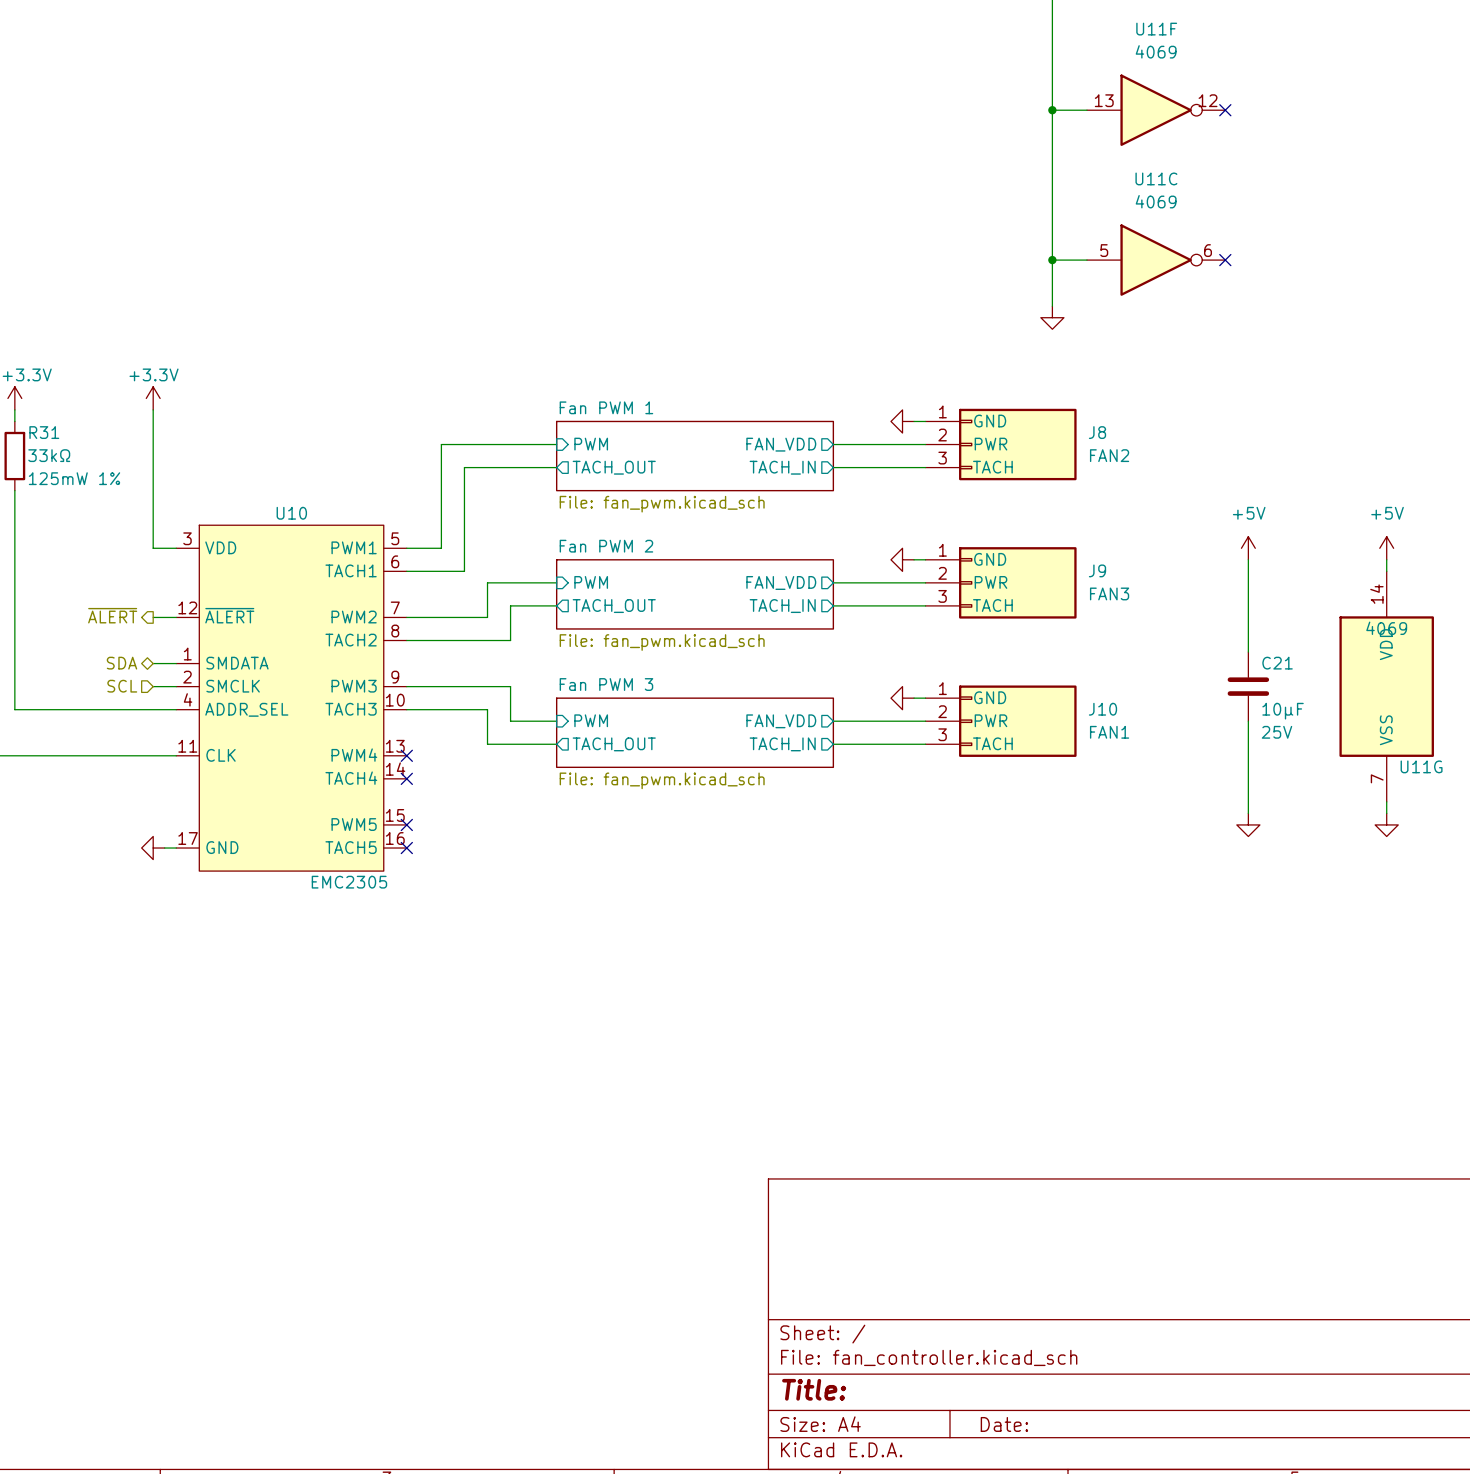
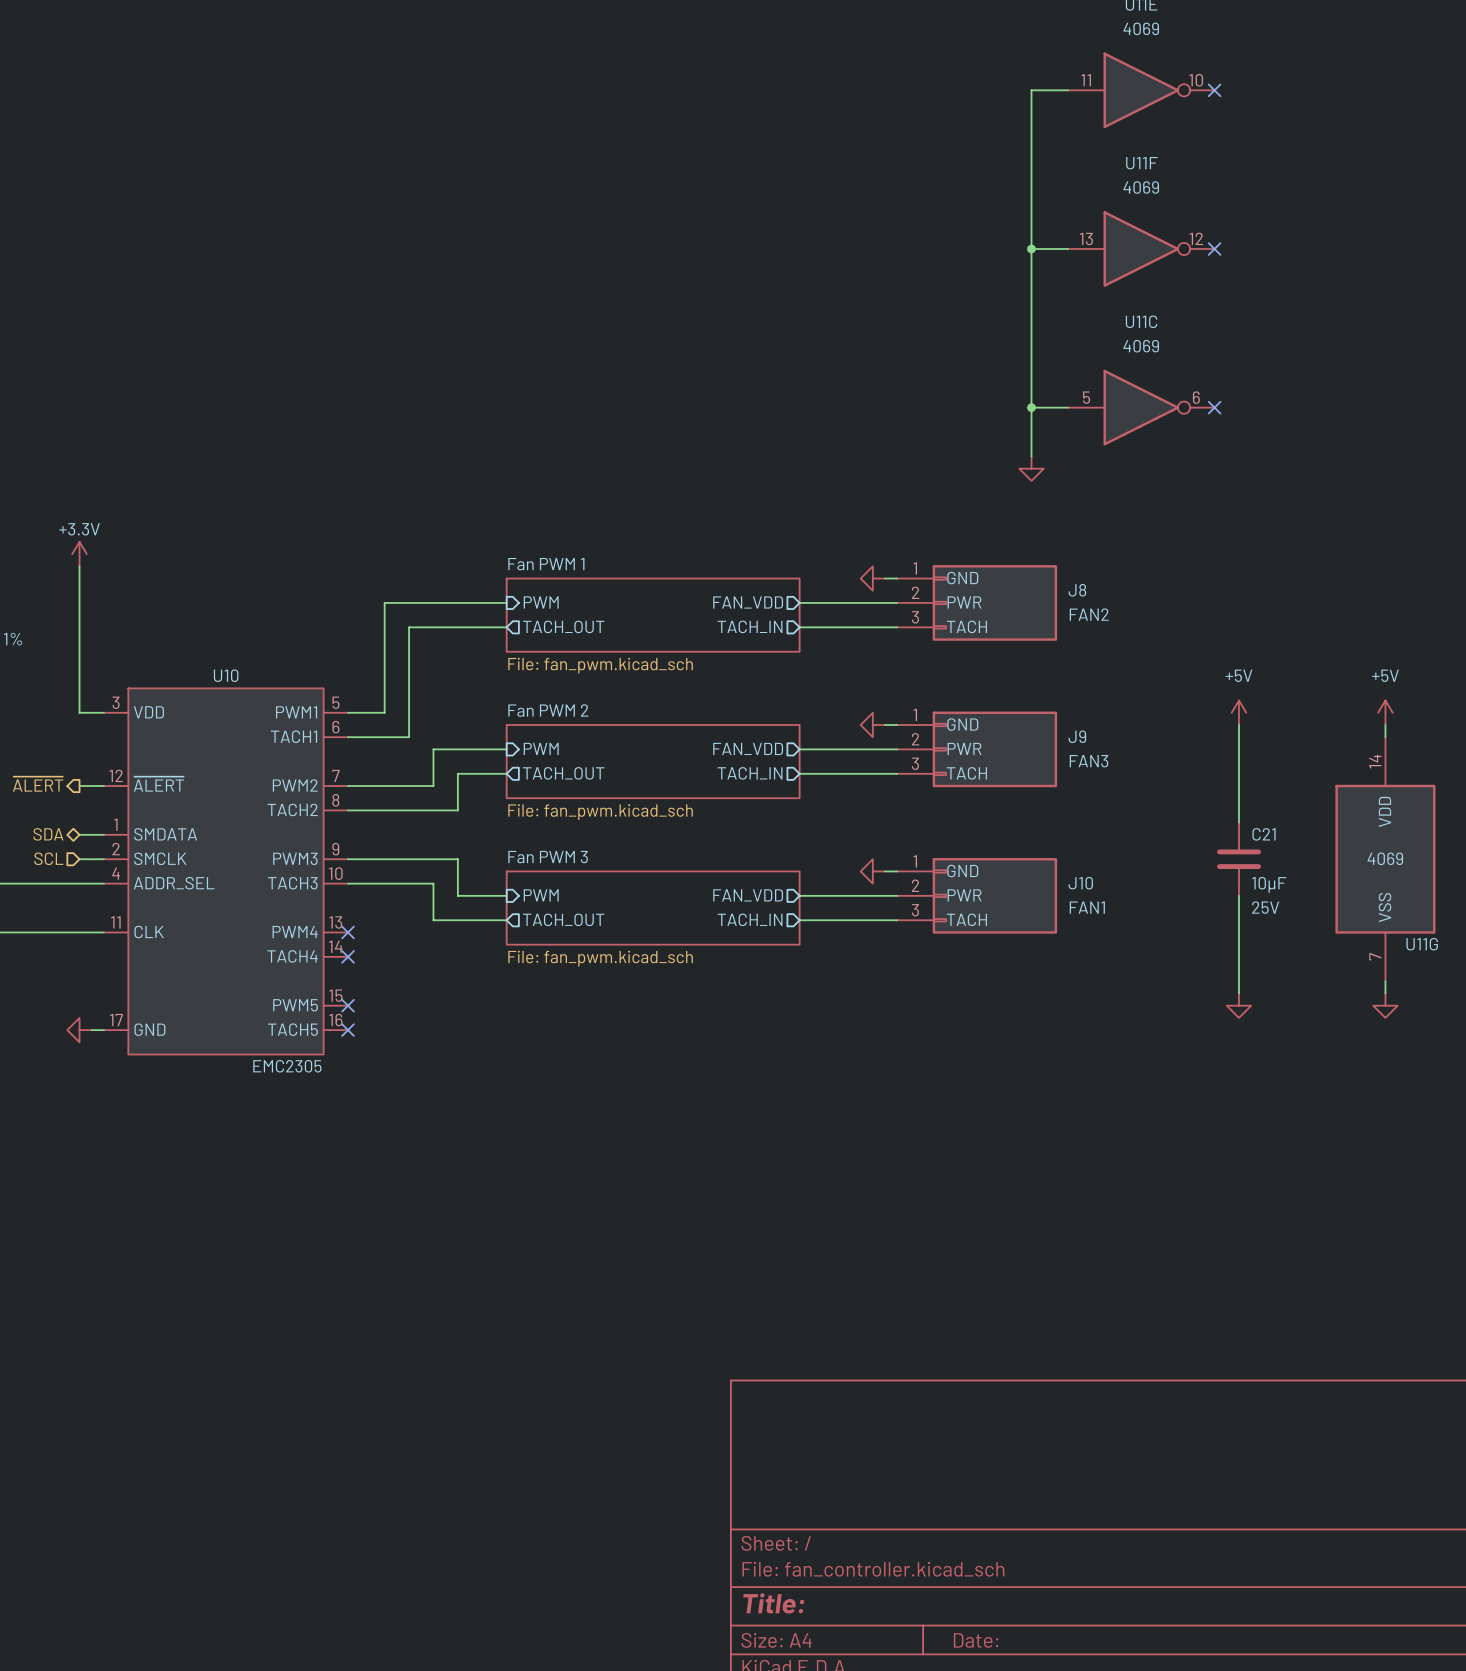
U11G value position: 4069 (1386, 628) -> 4069 (1385, 858)

